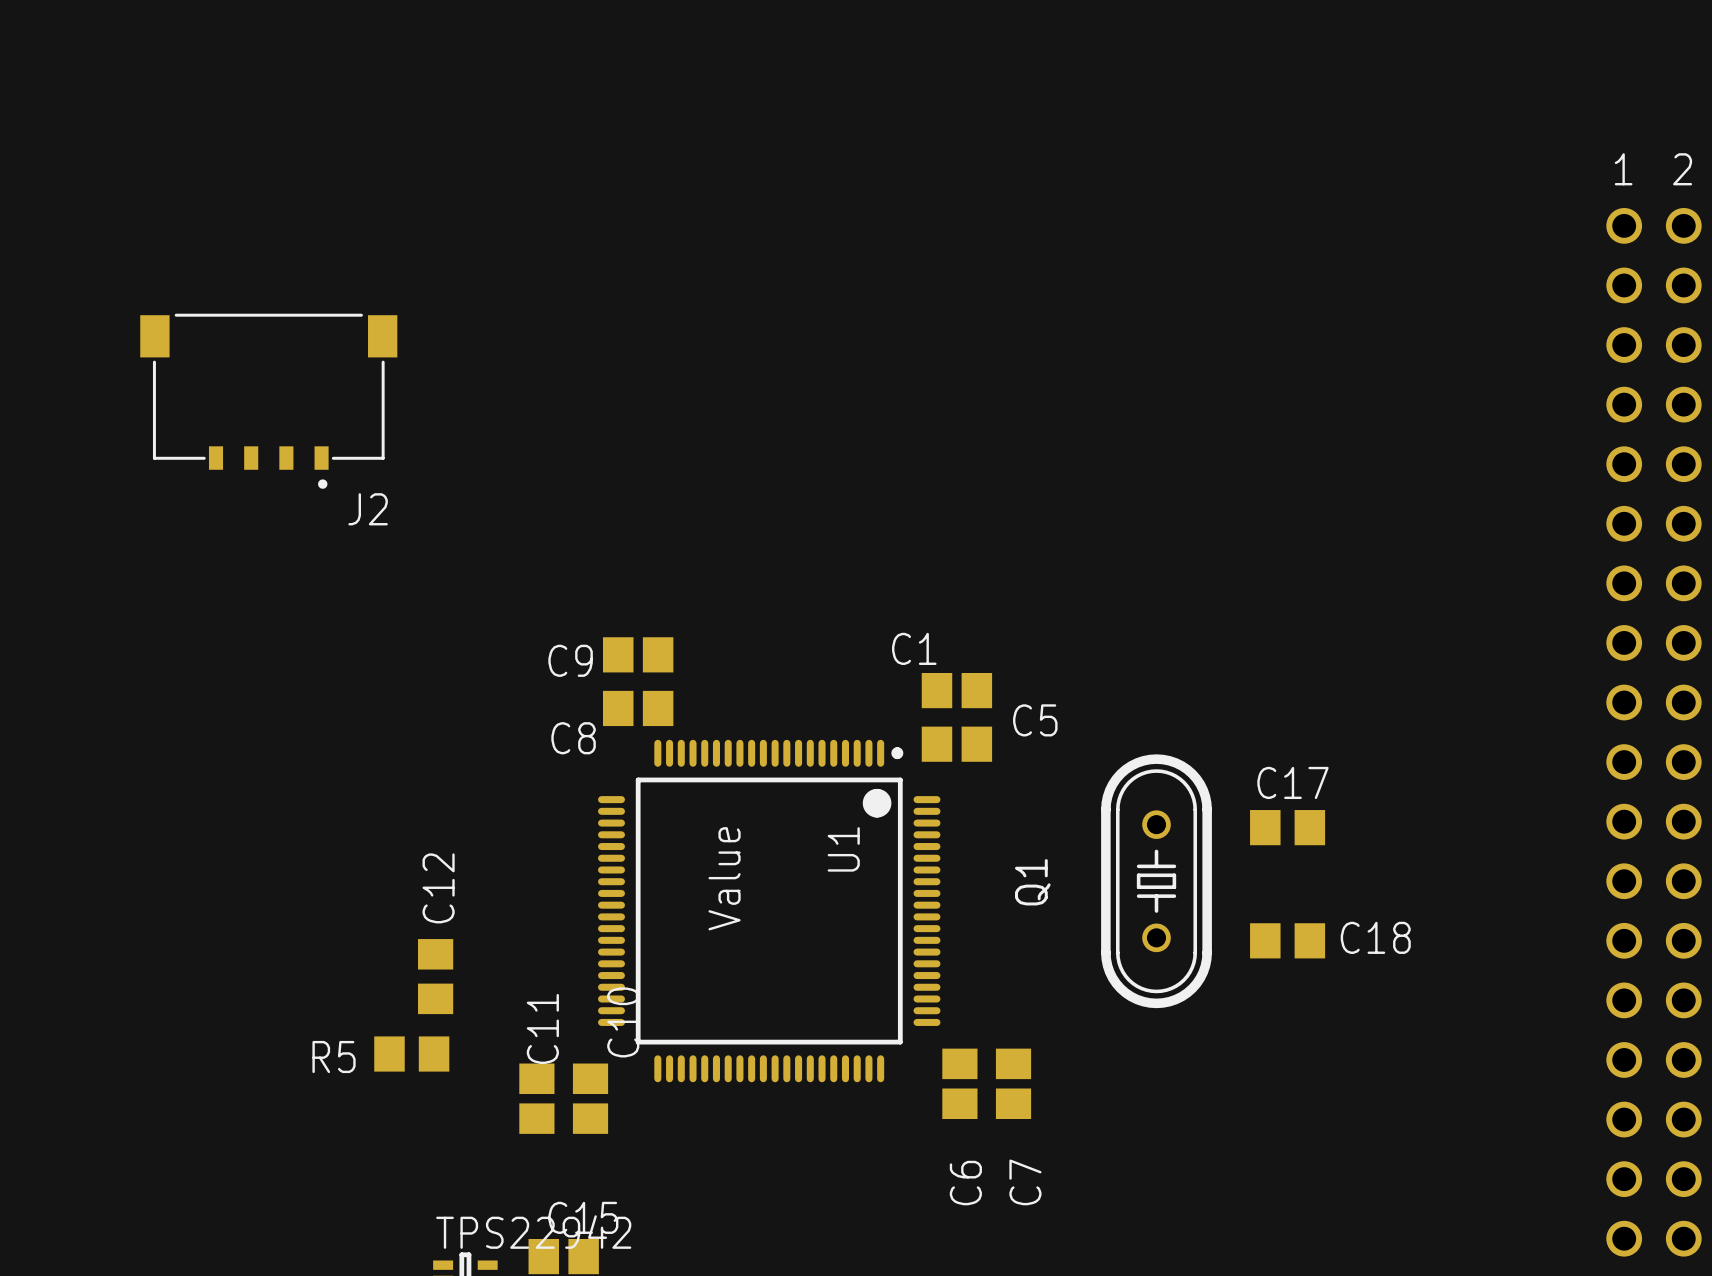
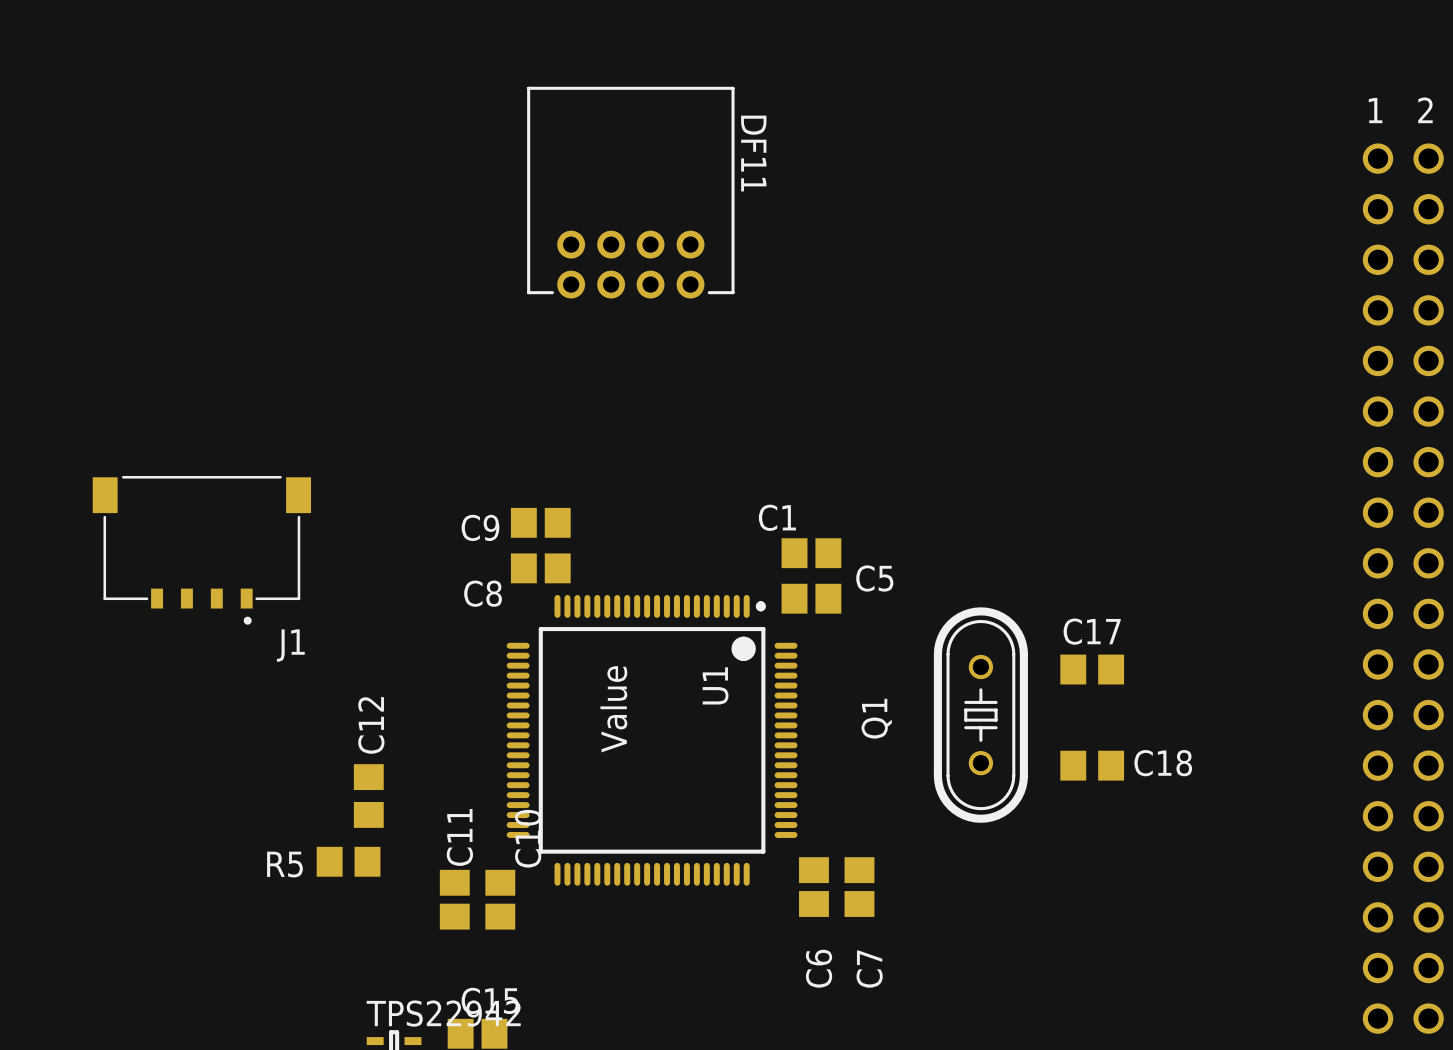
DF11: none -> (630, 192)
J2: (268, 401) -> none
J1: none -> (201, 550)

